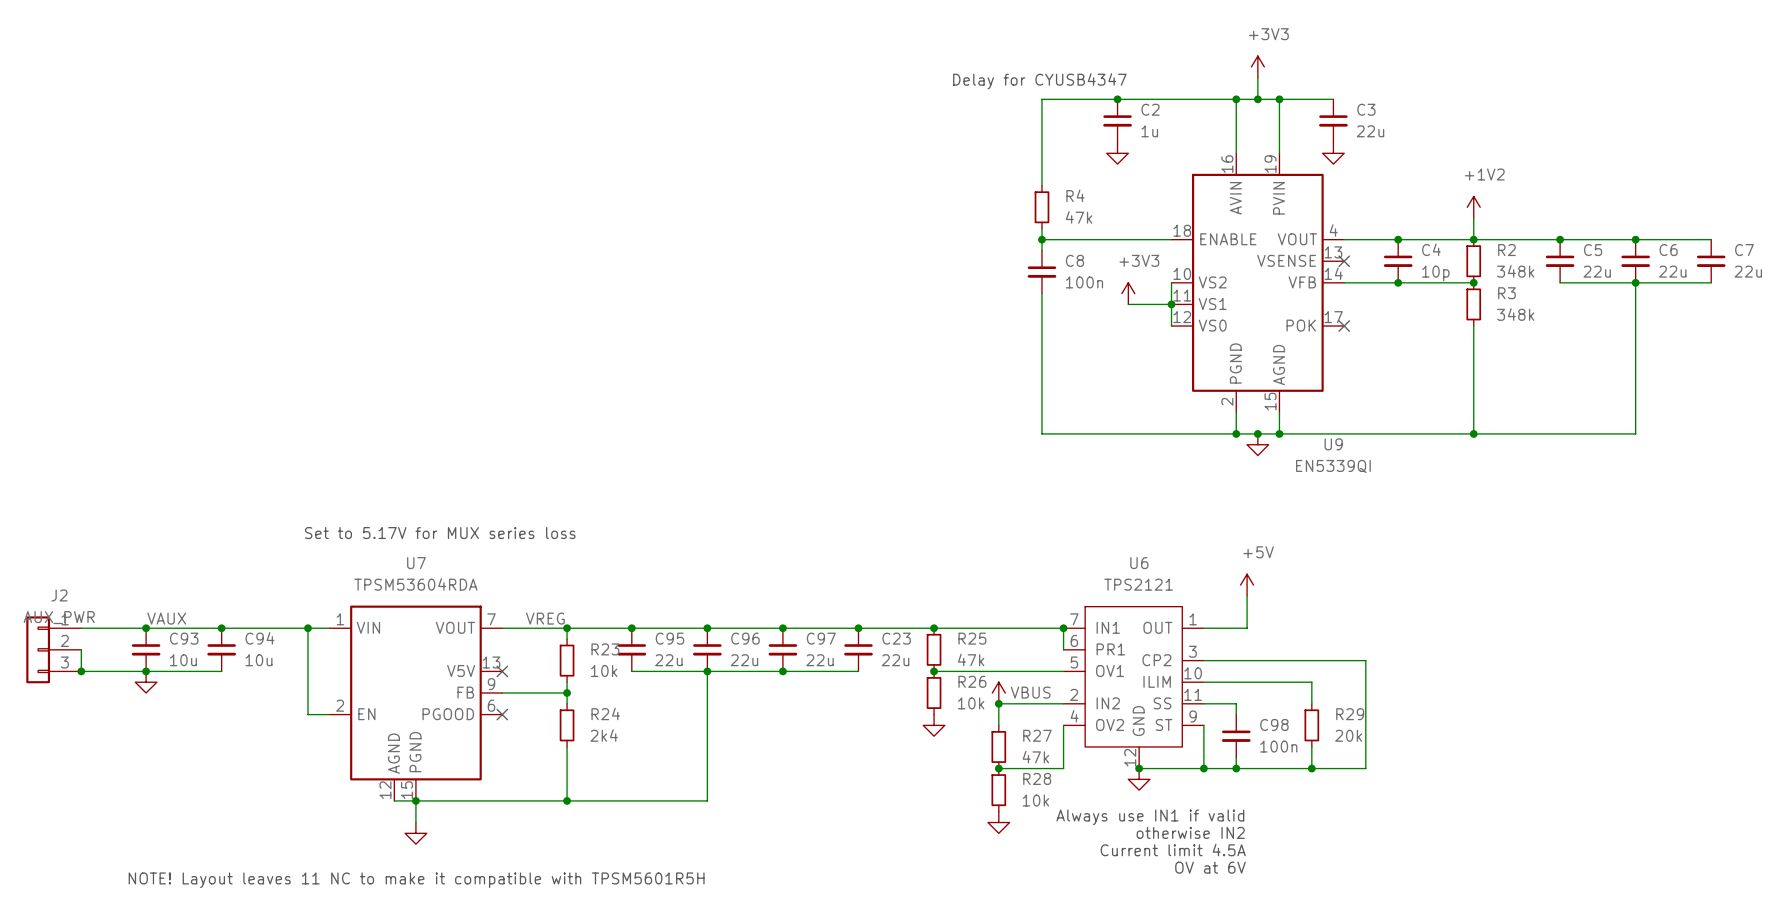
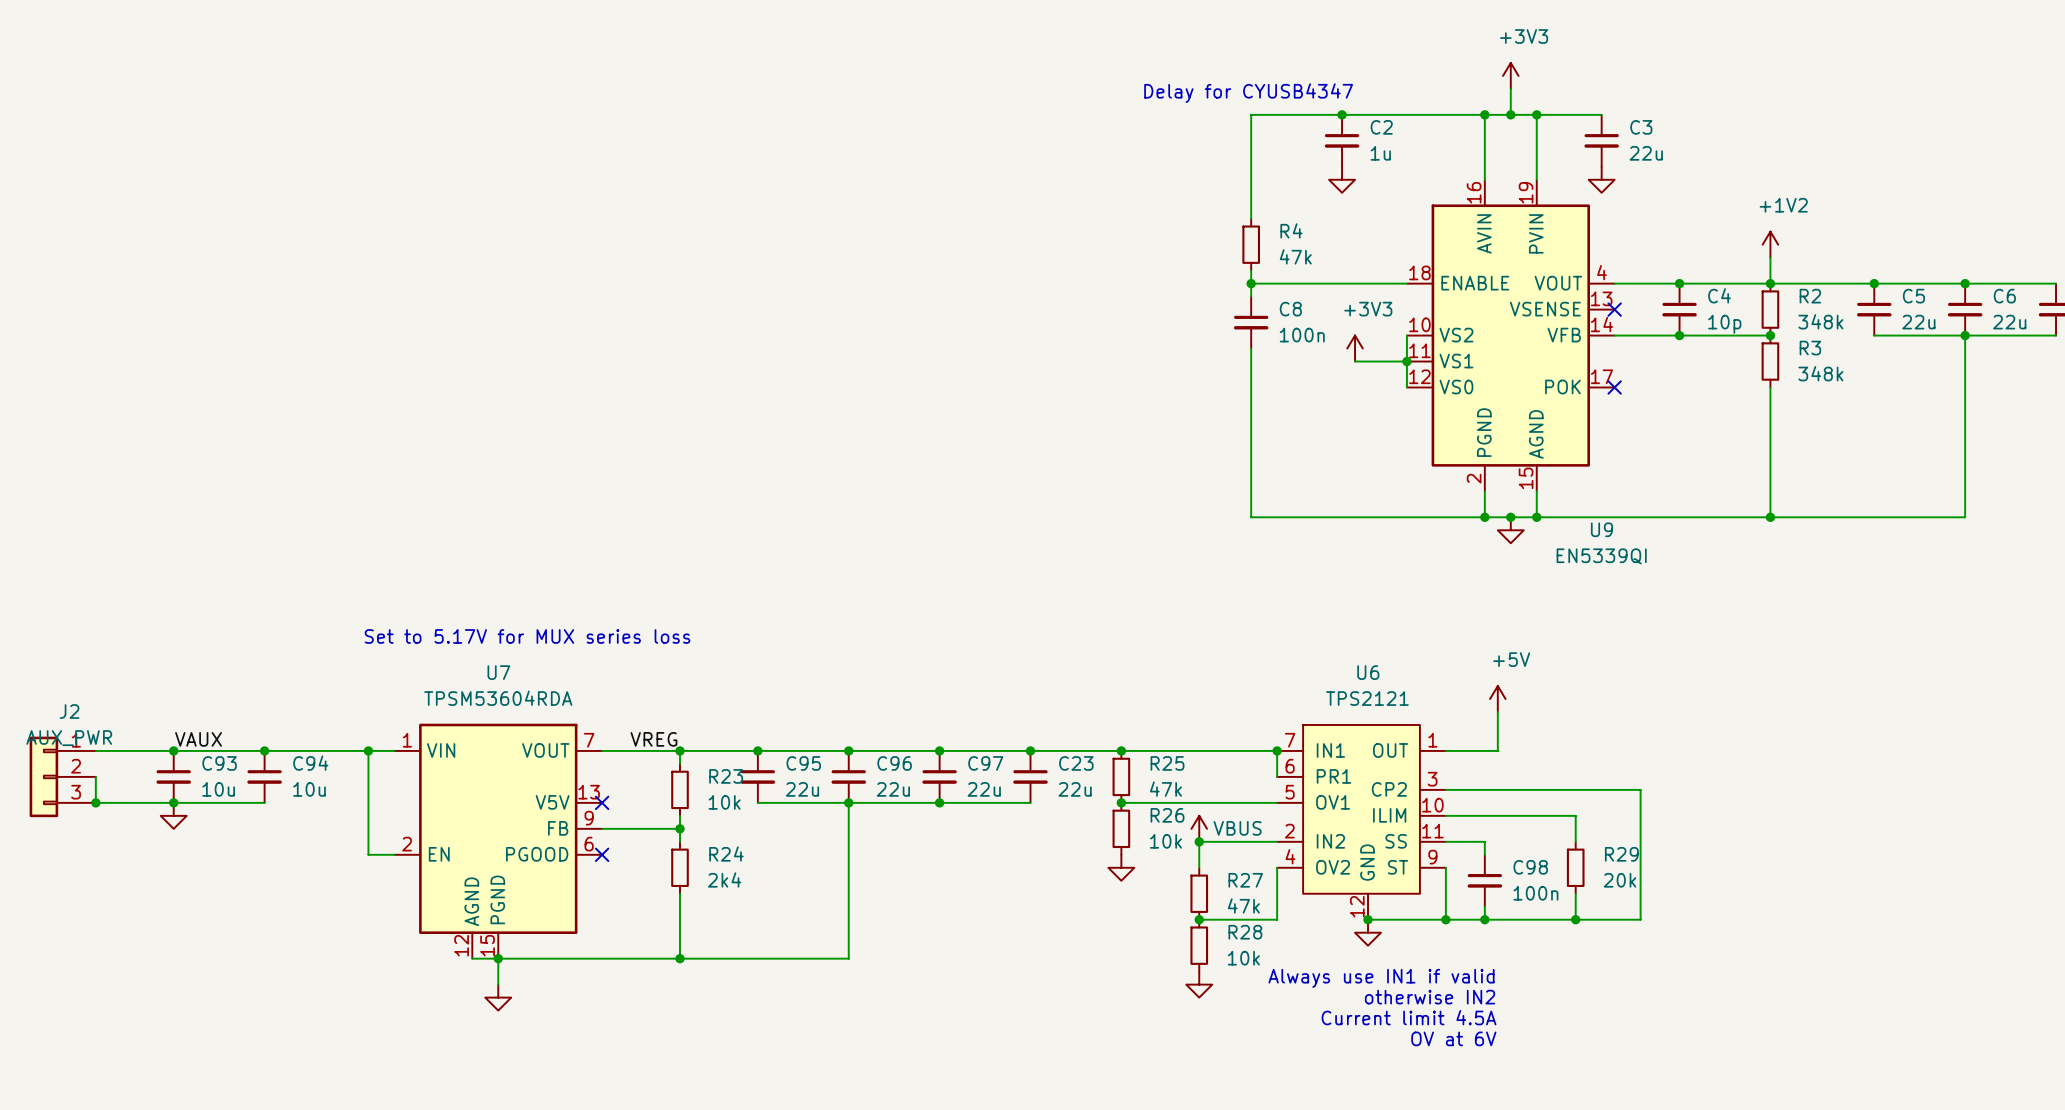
text: NOTE! Layout leaves 11 NC to make it compatible with TPSM5601R5H (416, 880) -> none

